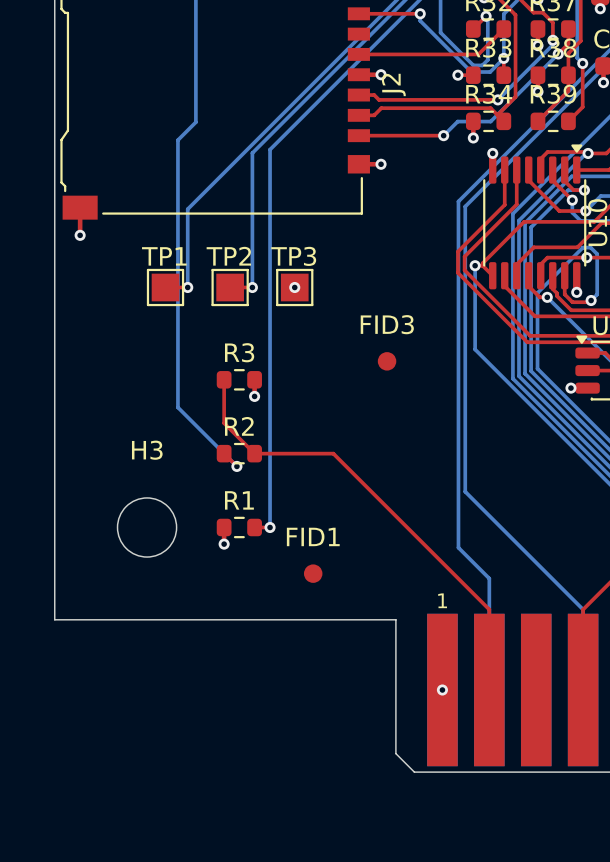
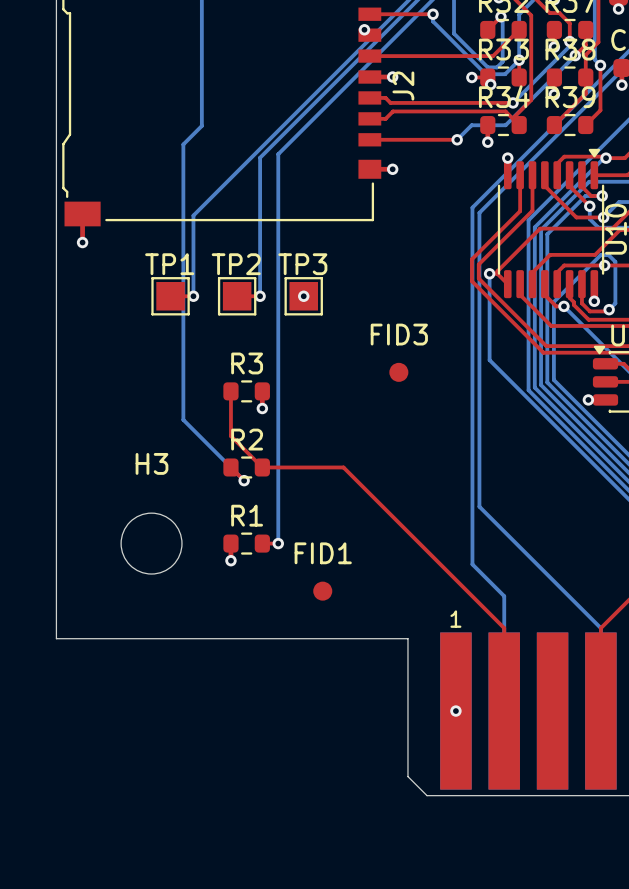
via: none -> (364, 29)
via: none -> (490, 84)

